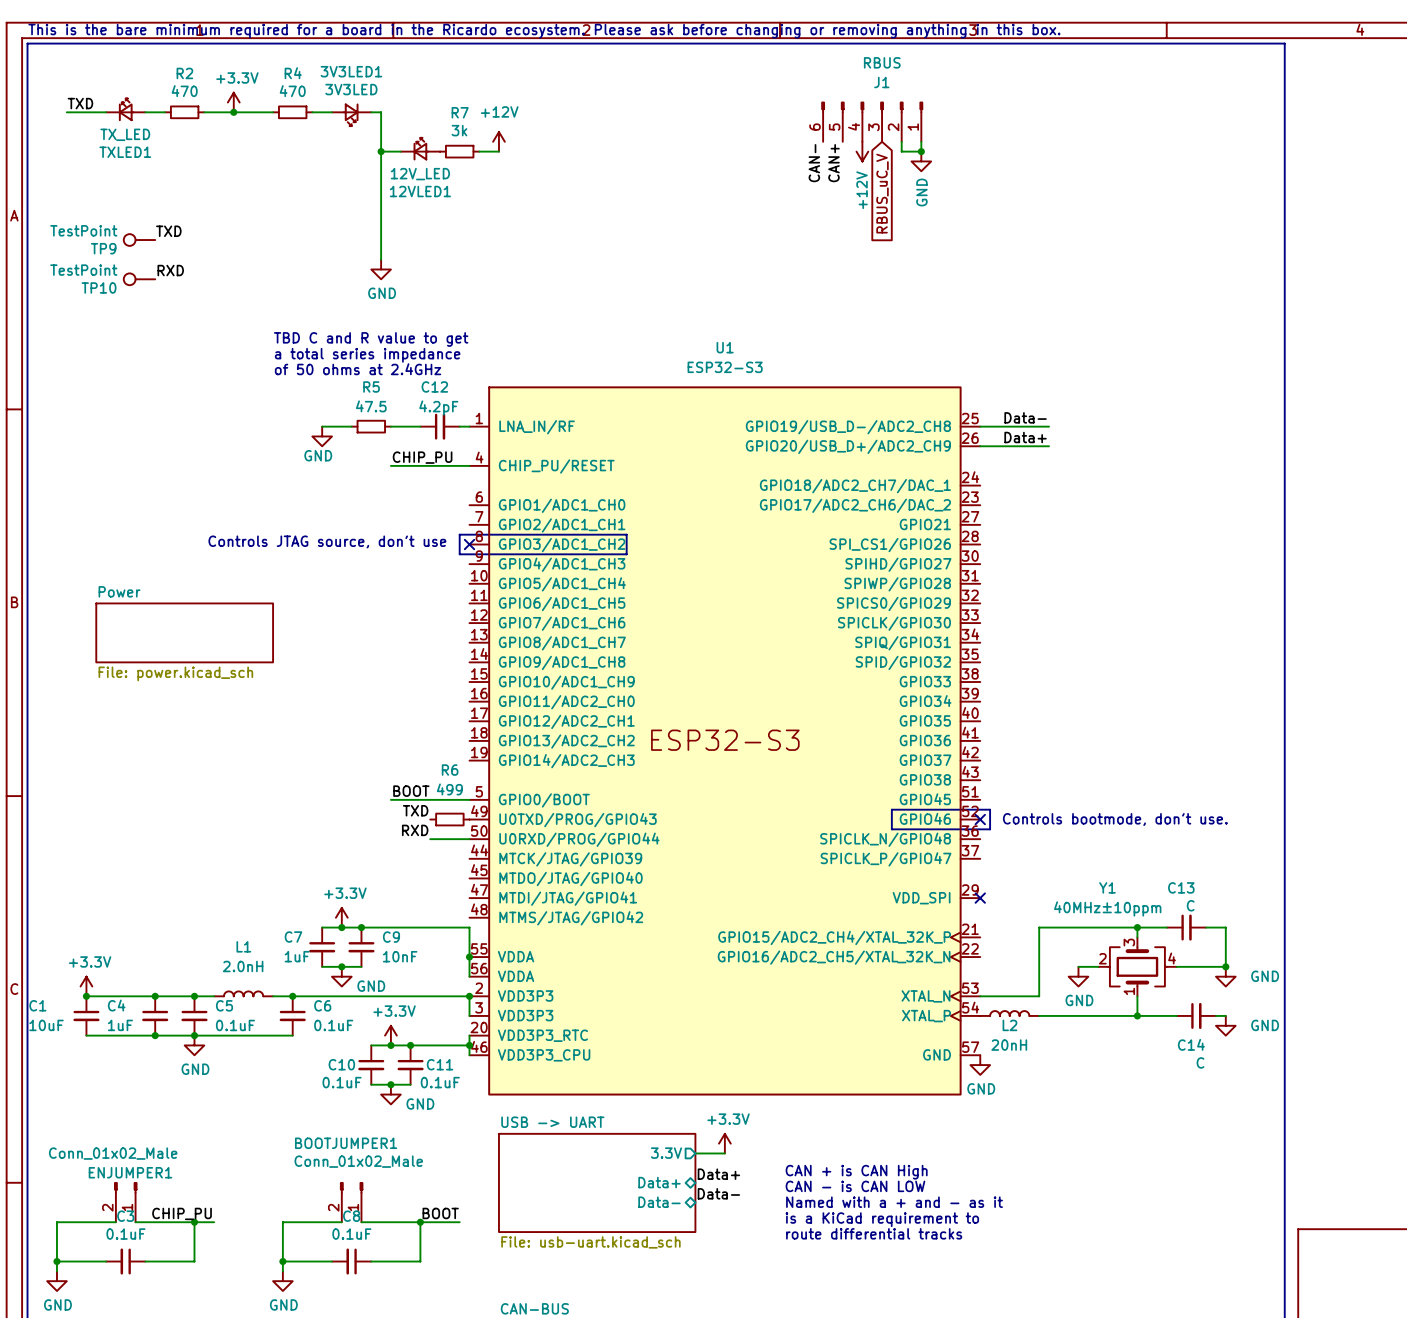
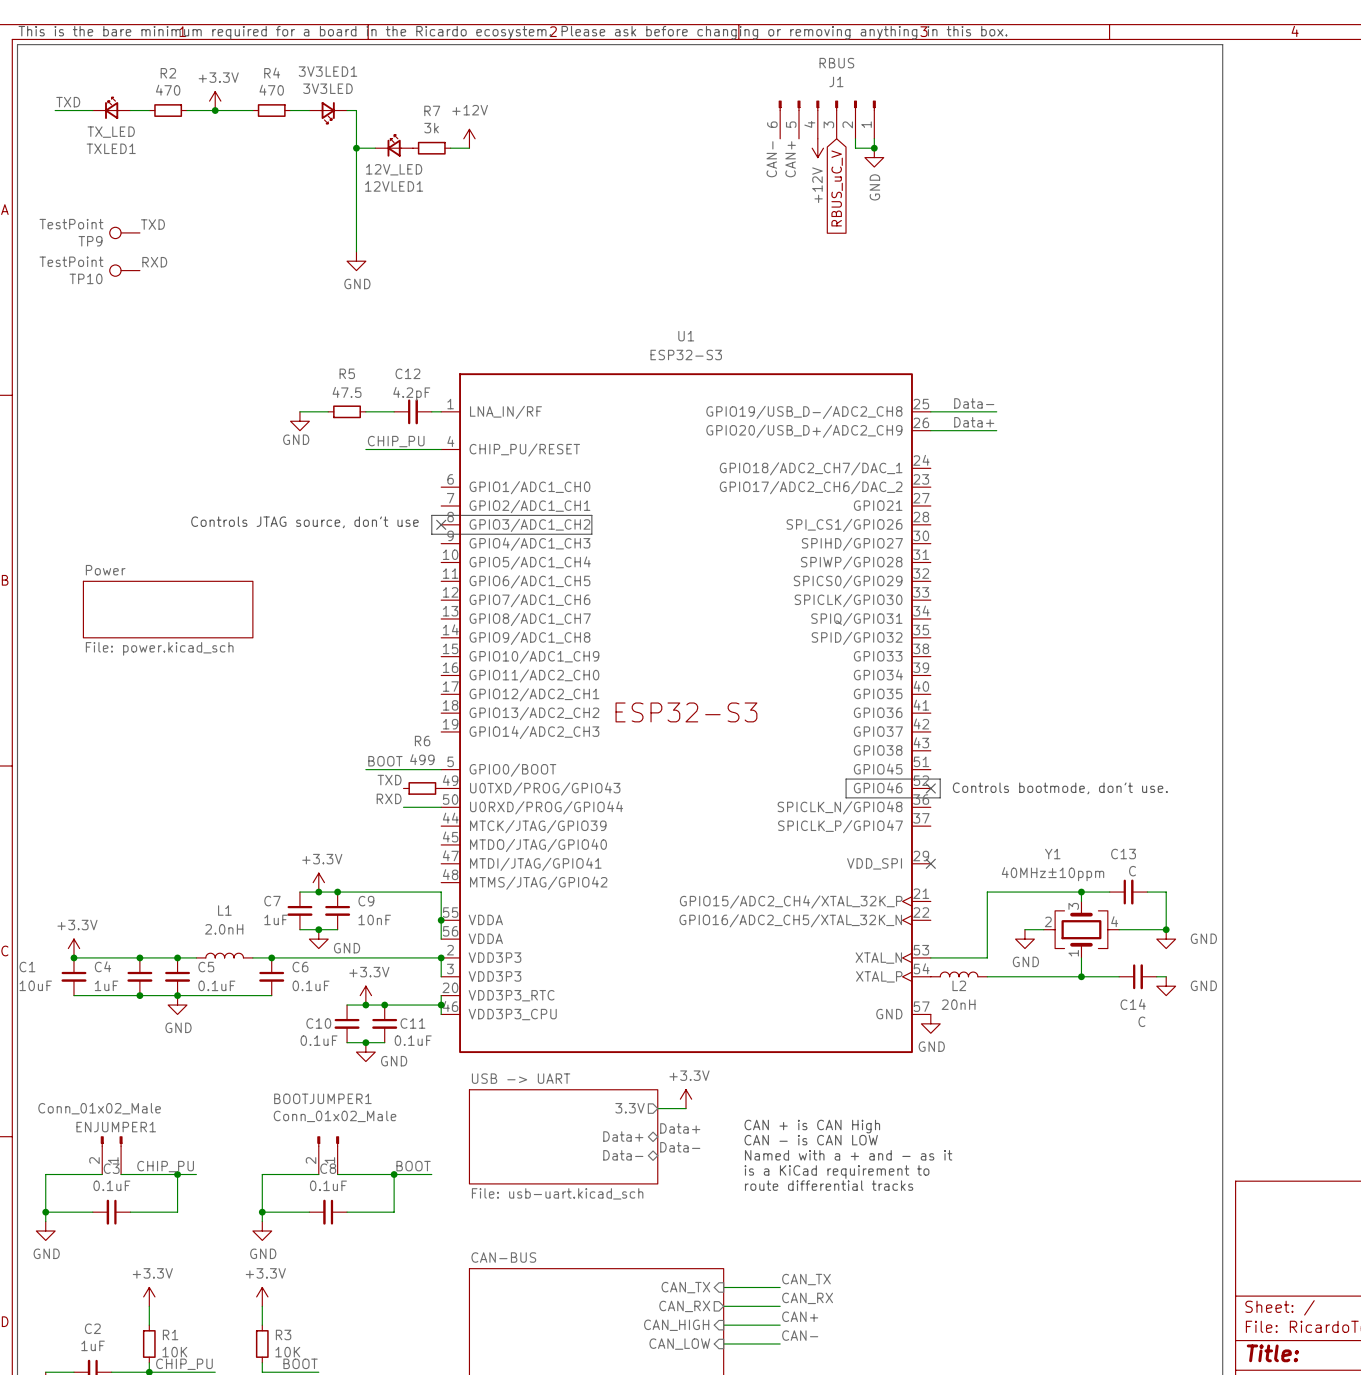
text: TBD C and R value to get (371, 339) -> none
text: a total series impedance (367, 355) -> none
text: of 50 ohms at 2.4GHz (358, 369) -> none

